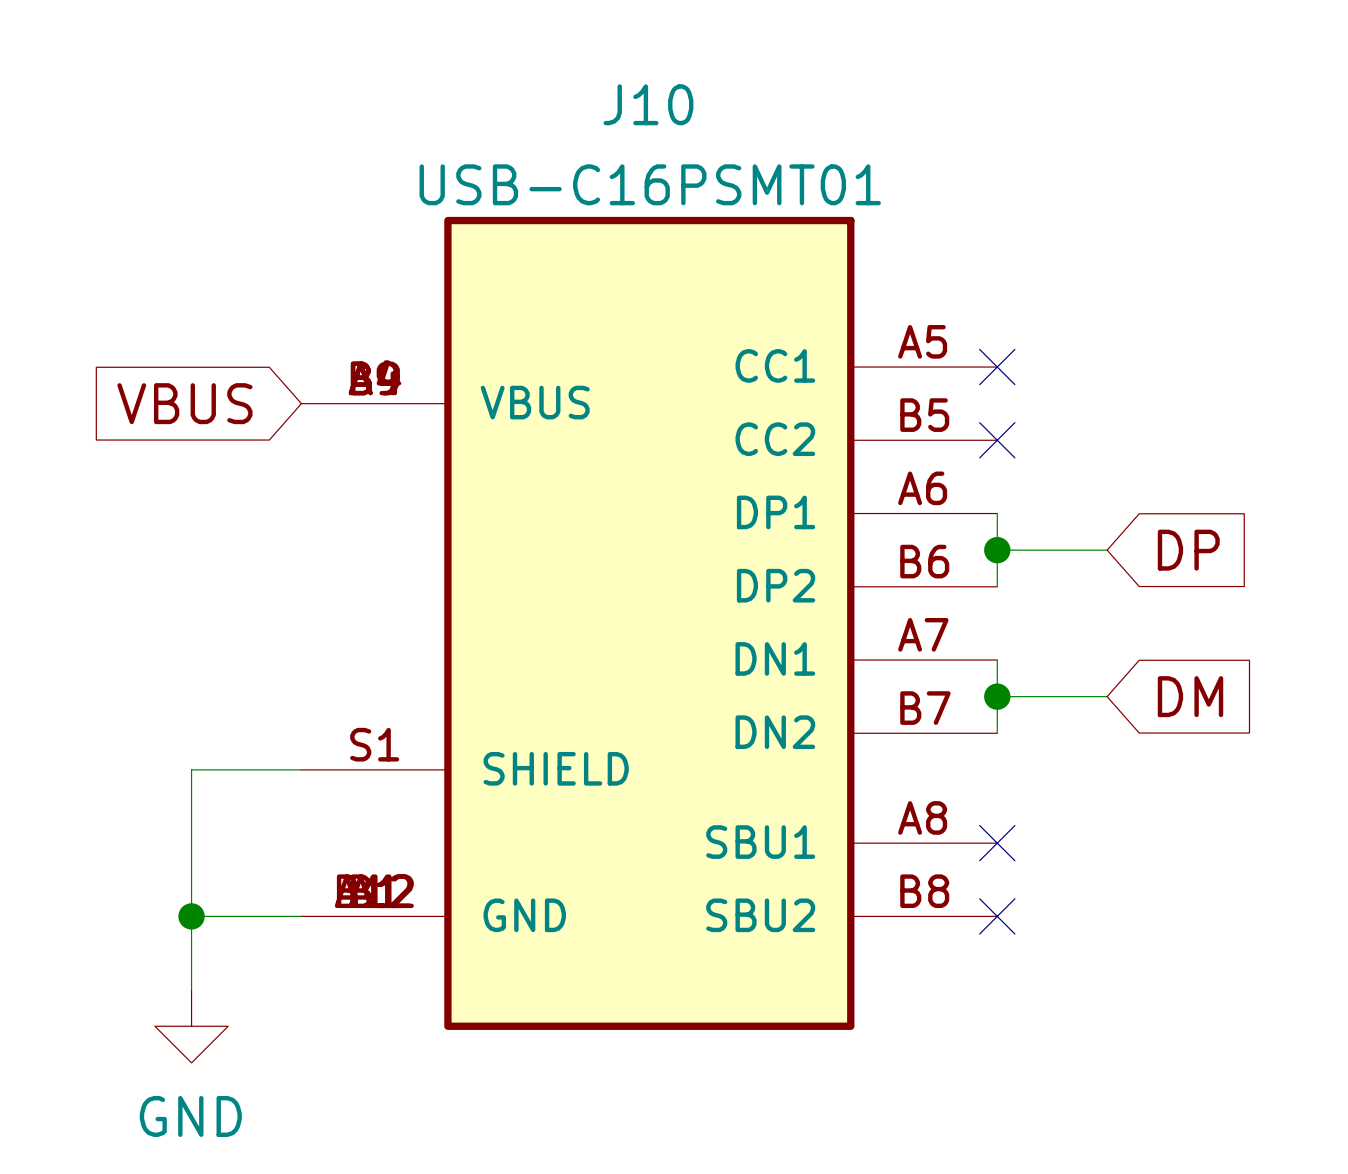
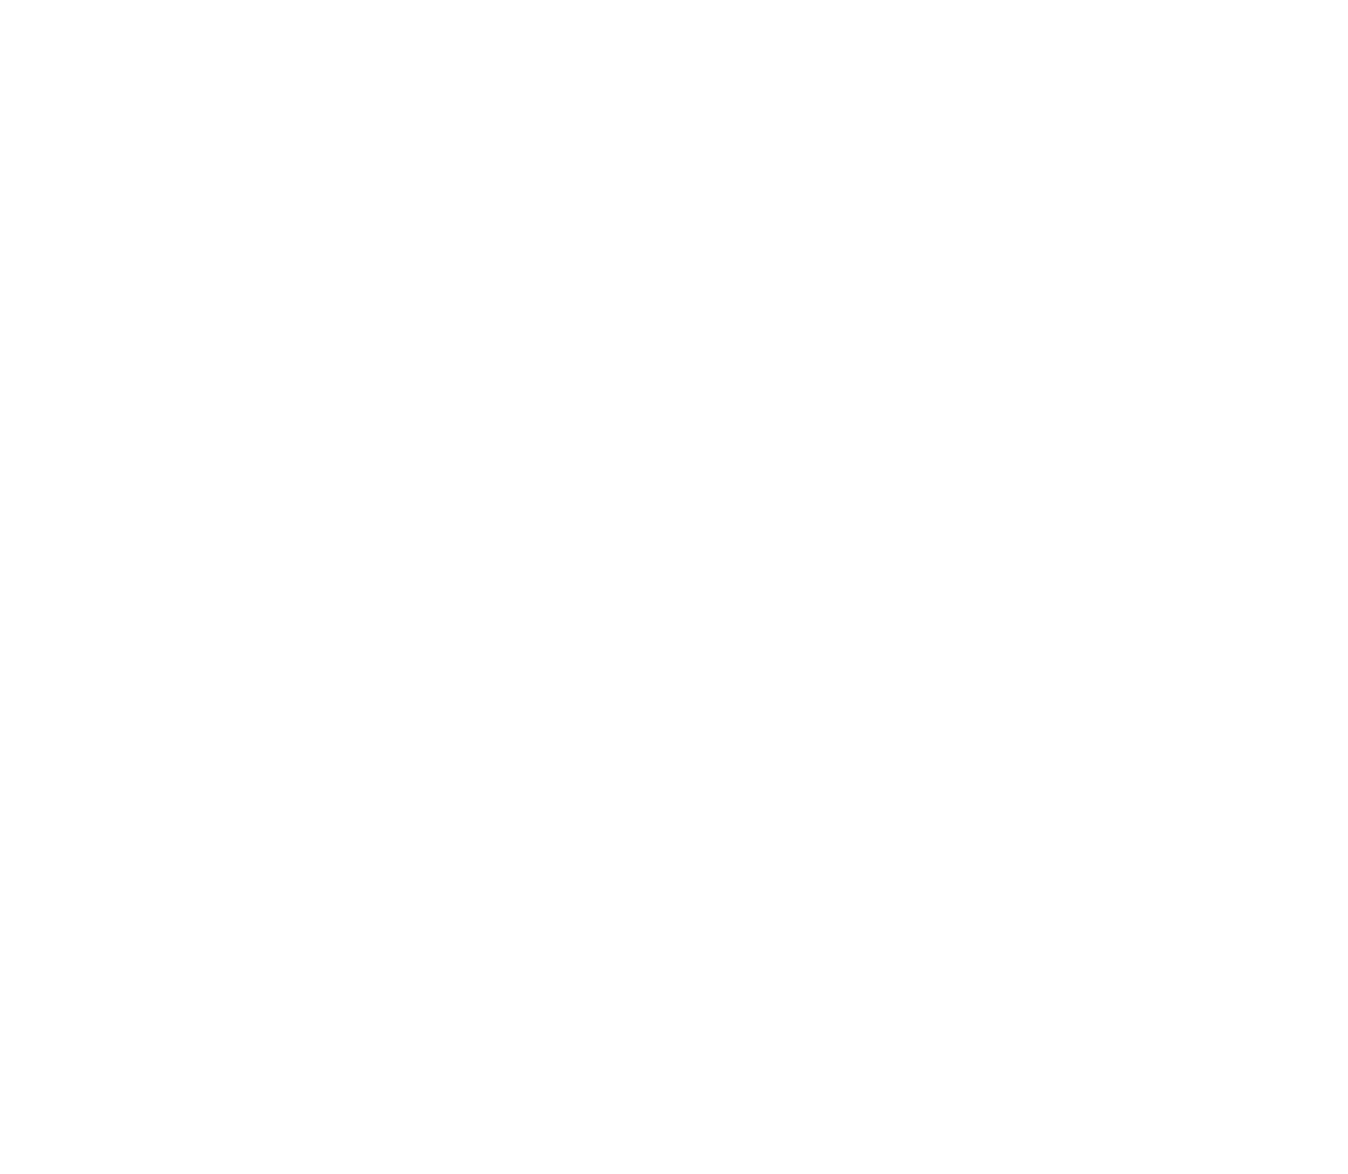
no-connect mark: (997, 367) -> none
global label: VBUS (184, 403) -> none
no-connect mark: (997, 440) -> none
wire: (997, 513) (997, 586) -> none
wire: (997, 550) (1107, 550) -> none
junction: (997, 550) -> none
global label: DP (1188, 550) -> none
J10: USB-C16PSMT01 (649, 623) -> none
wire: (997, 660) (997, 733) -> none
wire: (997, 696) (1107, 696) -> none
junction: (997, 696) -> none
global label: DM (1190, 696) -> none
wire: (301, 769) (191, 769) (191, 989) -> none
no-connect mark: (997, 843) -> none
wire: (191, 916) (301, 916) -> none
junction: (191, 916) -> none
no-connect mark: (997, 916) -> none
power symbol: GND (191, 1026) -> none

